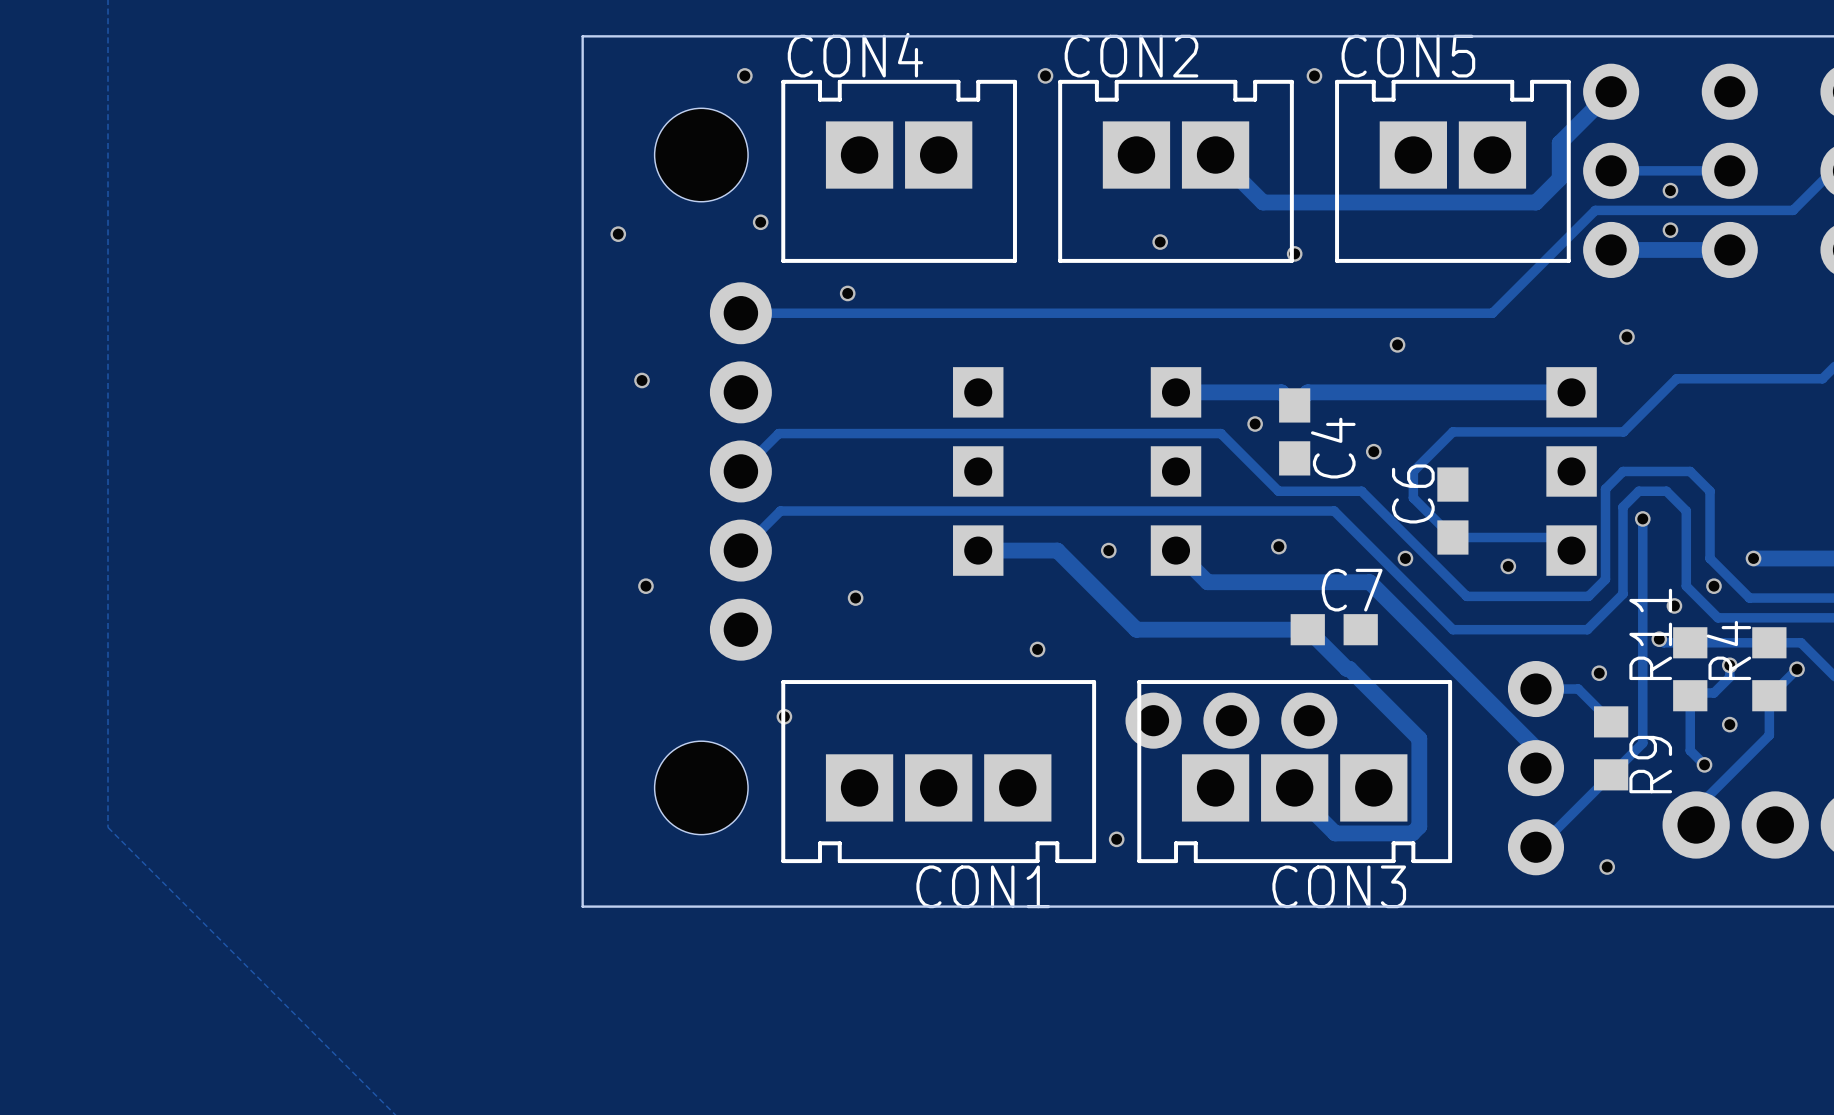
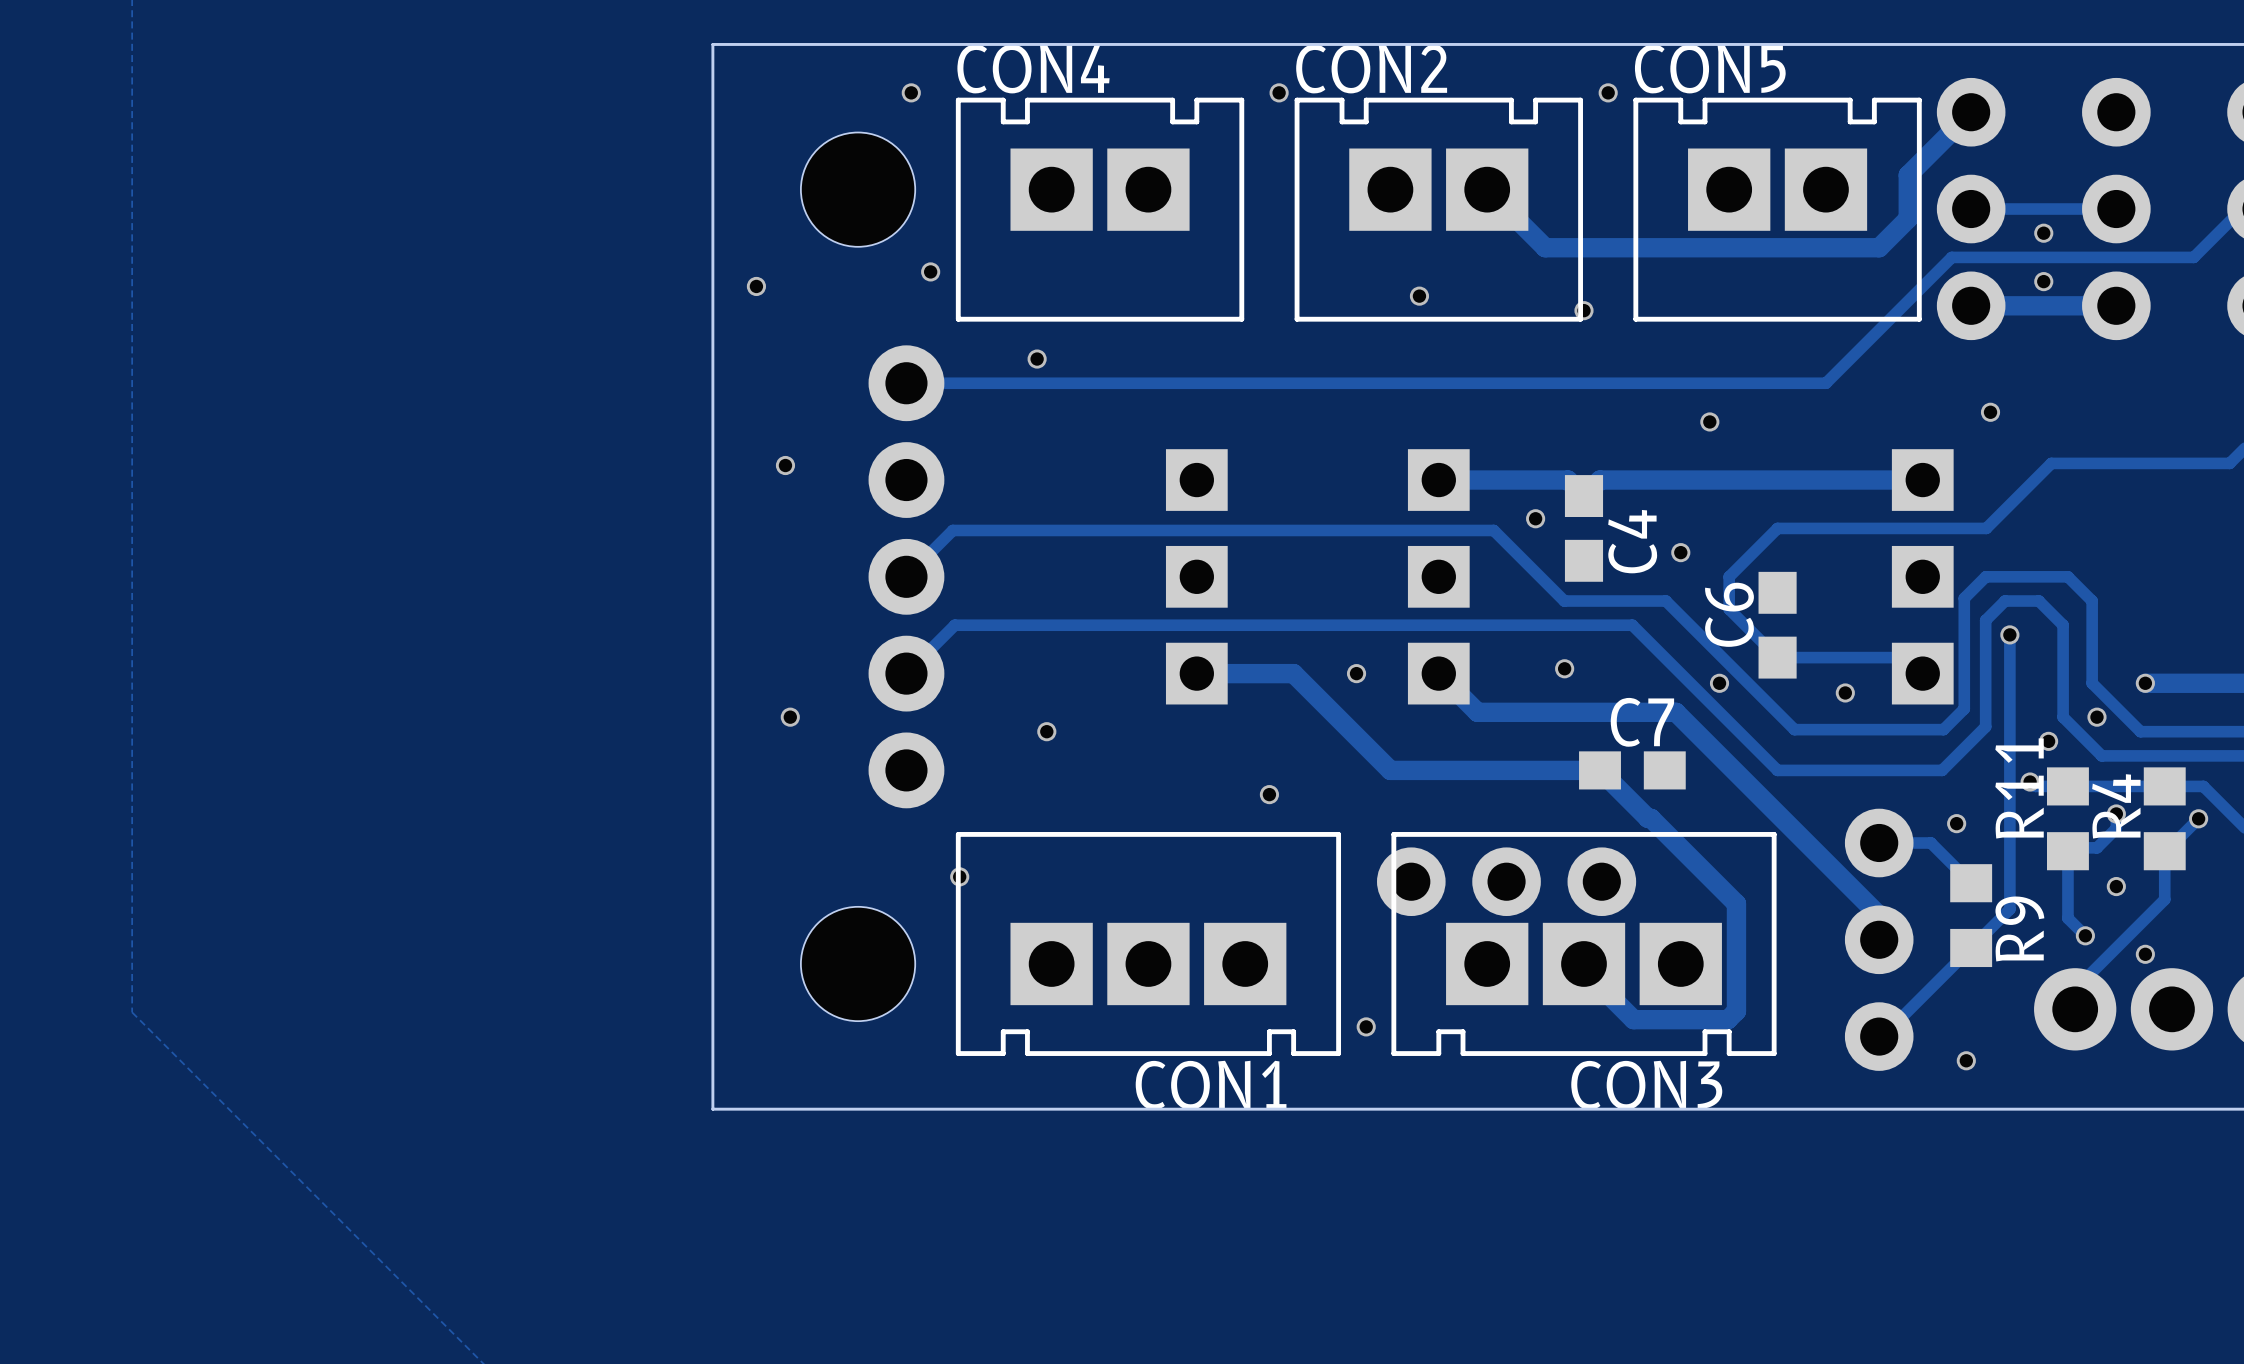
via: none -> (2145, 954)

